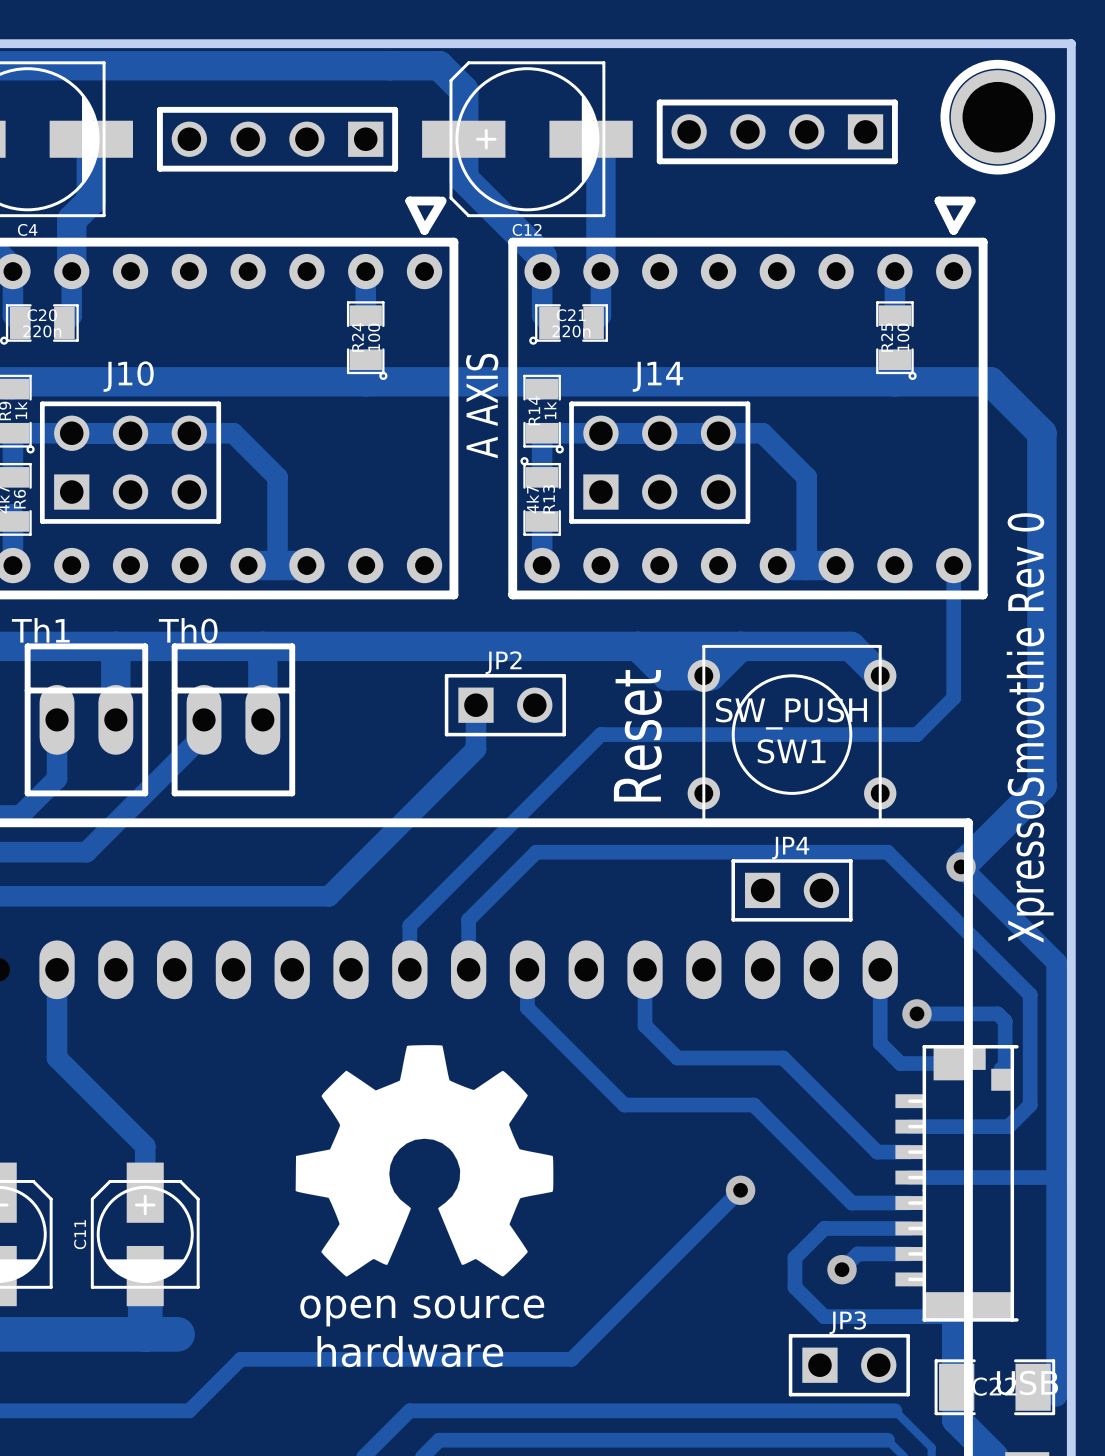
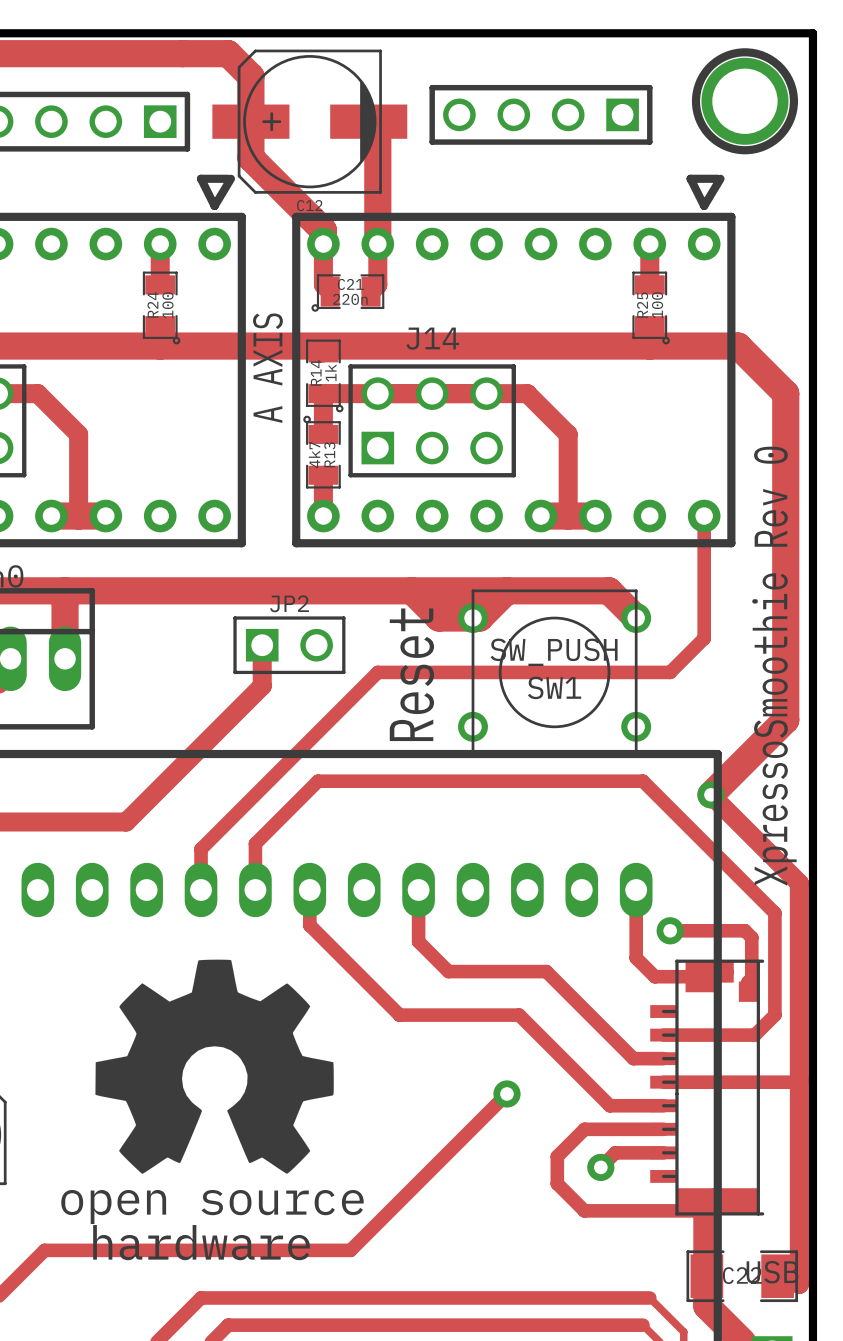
JP4: (792, 890) -> none
drawing shape: [295, 1045, 554, 1368] -> [61, 959, 364, 1261]
JP3: (849, 1365) -> none

